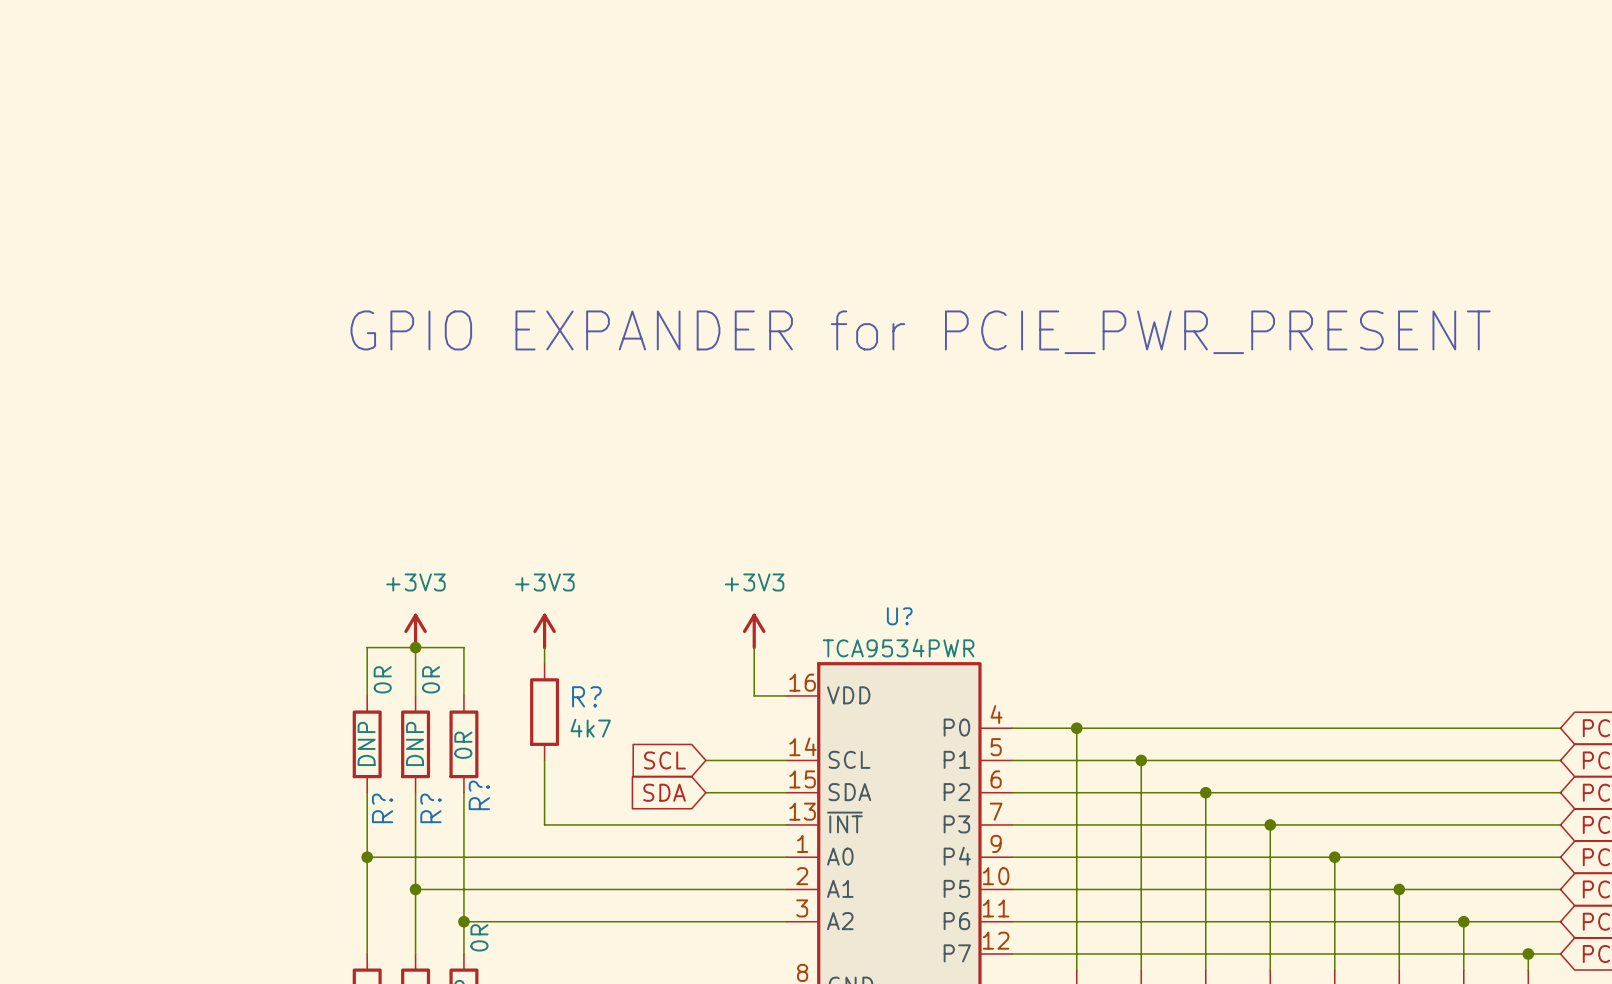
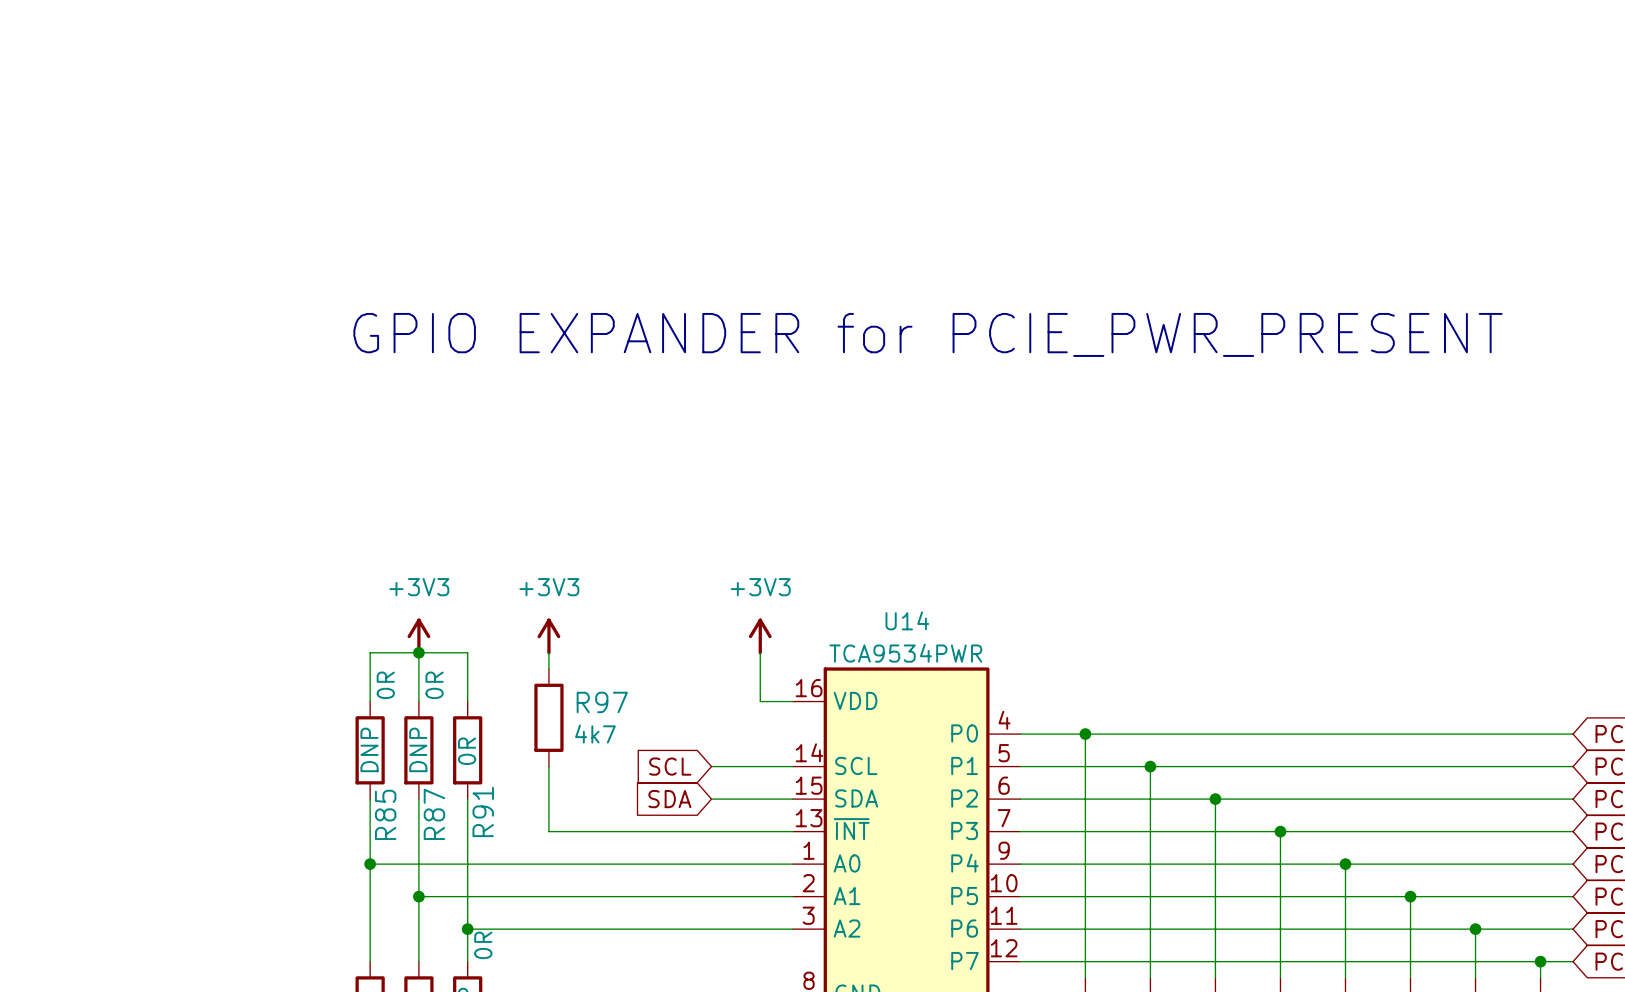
U? name: U? (899, 616) -> U14 (907, 620)
R? name: R? (586, 696) -> R97 (602, 702)
R? name: R? (479, 795) -> R91 (483, 811)
R? name: R? (382, 808) -> R85 (385, 814)
R? name: R? (430, 808) -> R87 (434, 814)

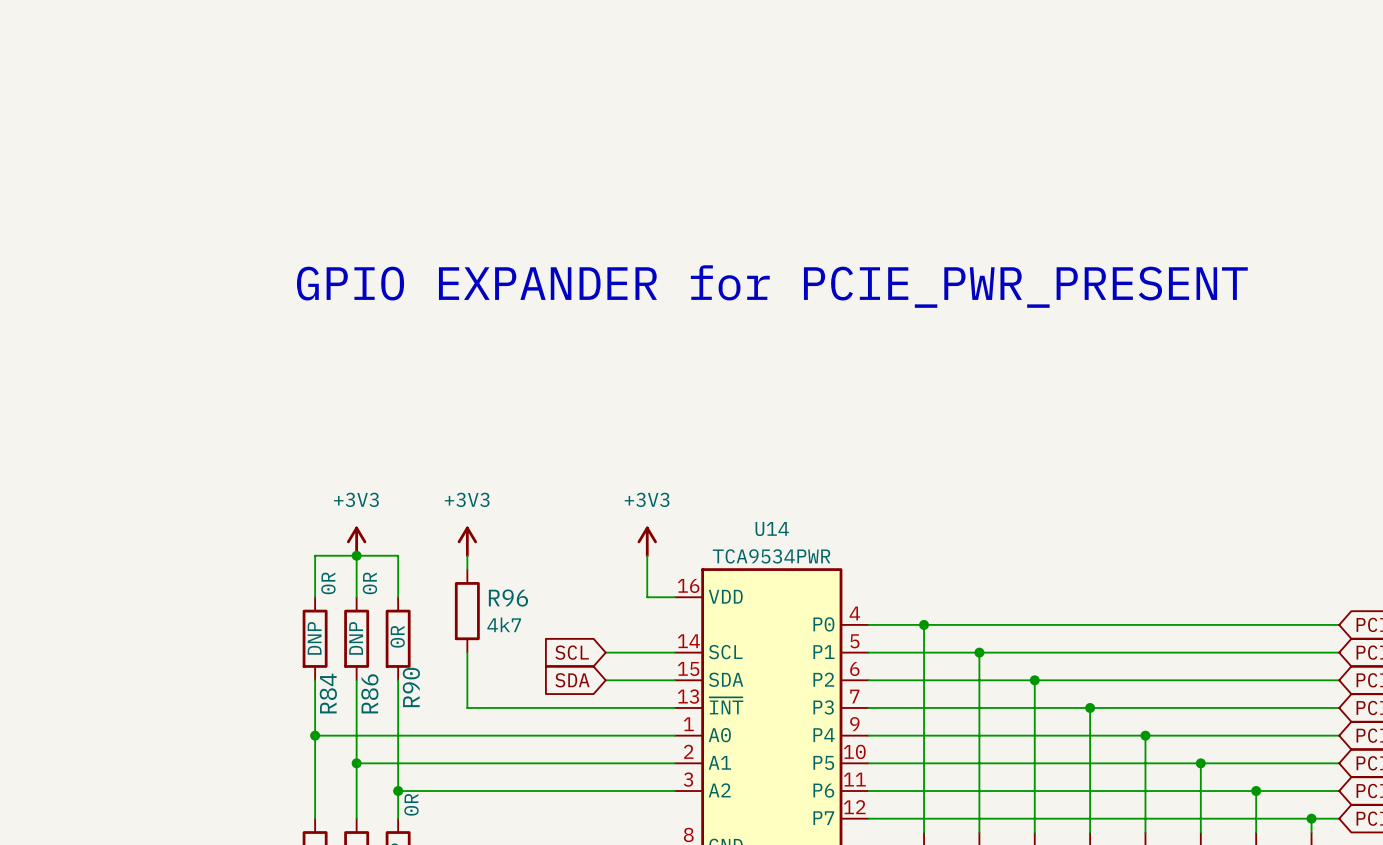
R97 name: R97 (602, 702) -> R96 (508, 598)
R91 name: R91 (483, 811) -> R90 (411, 687)
R85 name: R85 (385, 814) -> R84 (328, 693)
R87 name: R87 (434, 814) -> R86 (369, 693)

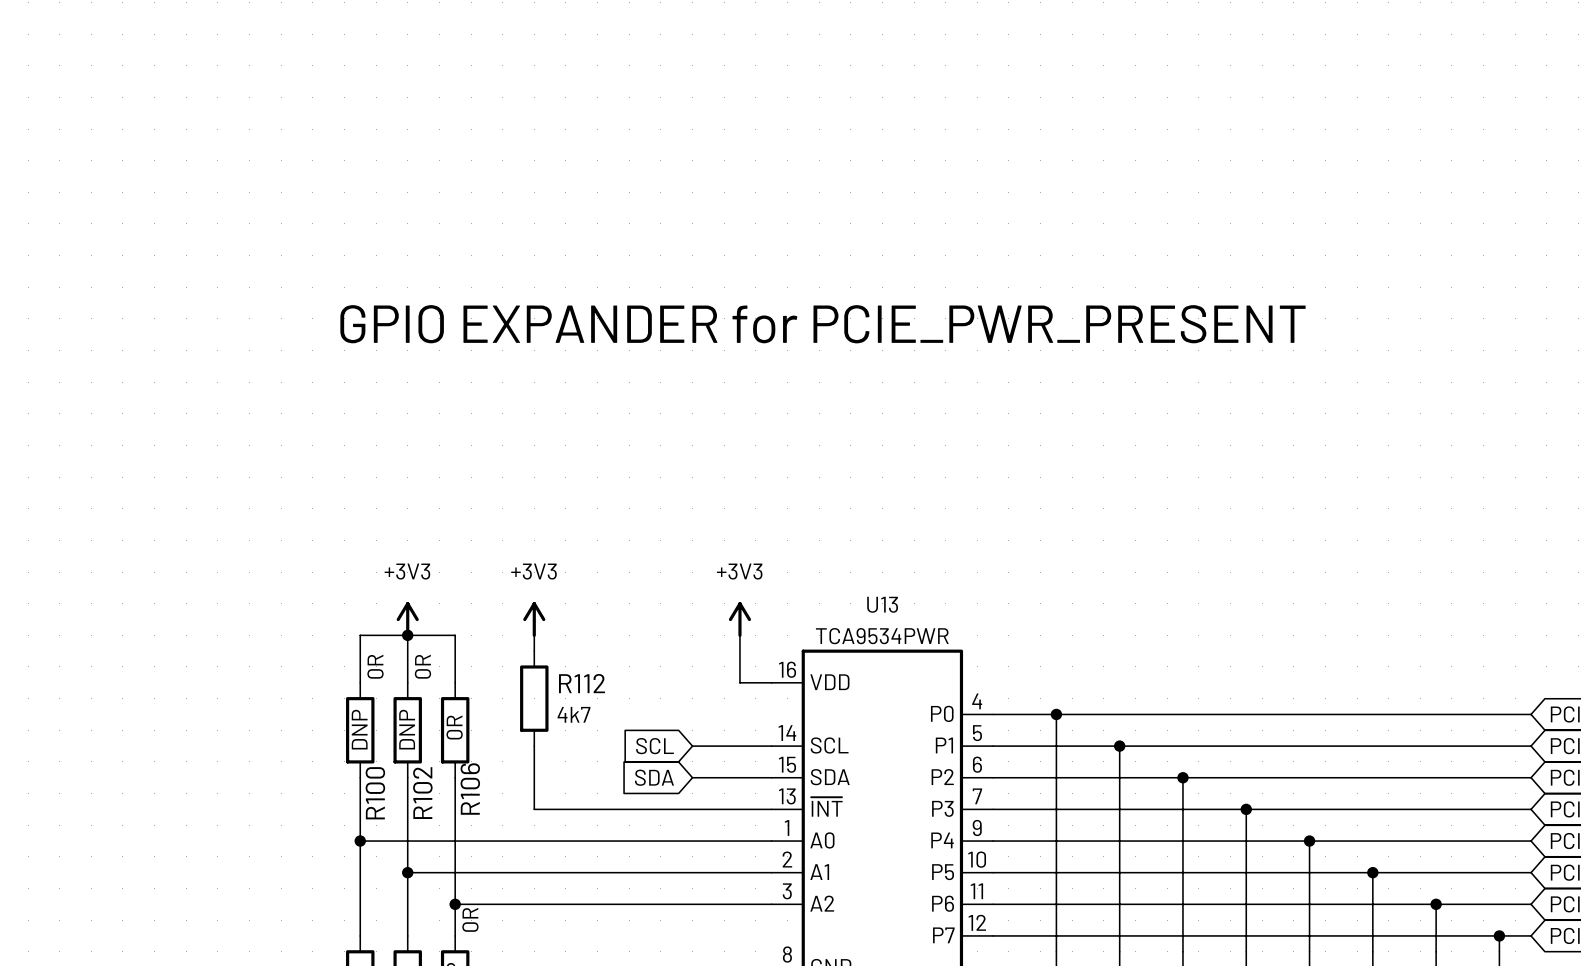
U14 name: U14 (772, 529) -> U13 (882, 604)
R96 name: R96 (508, 598) -> R112 (581, 683)
R90 name: R90 (411, 687) -> R106 (470, 789)
R84 name: R84 (328, 693) -> R100 (375, 793)
R86 name: R86 (369, 693) -> R102 (422, 793)

